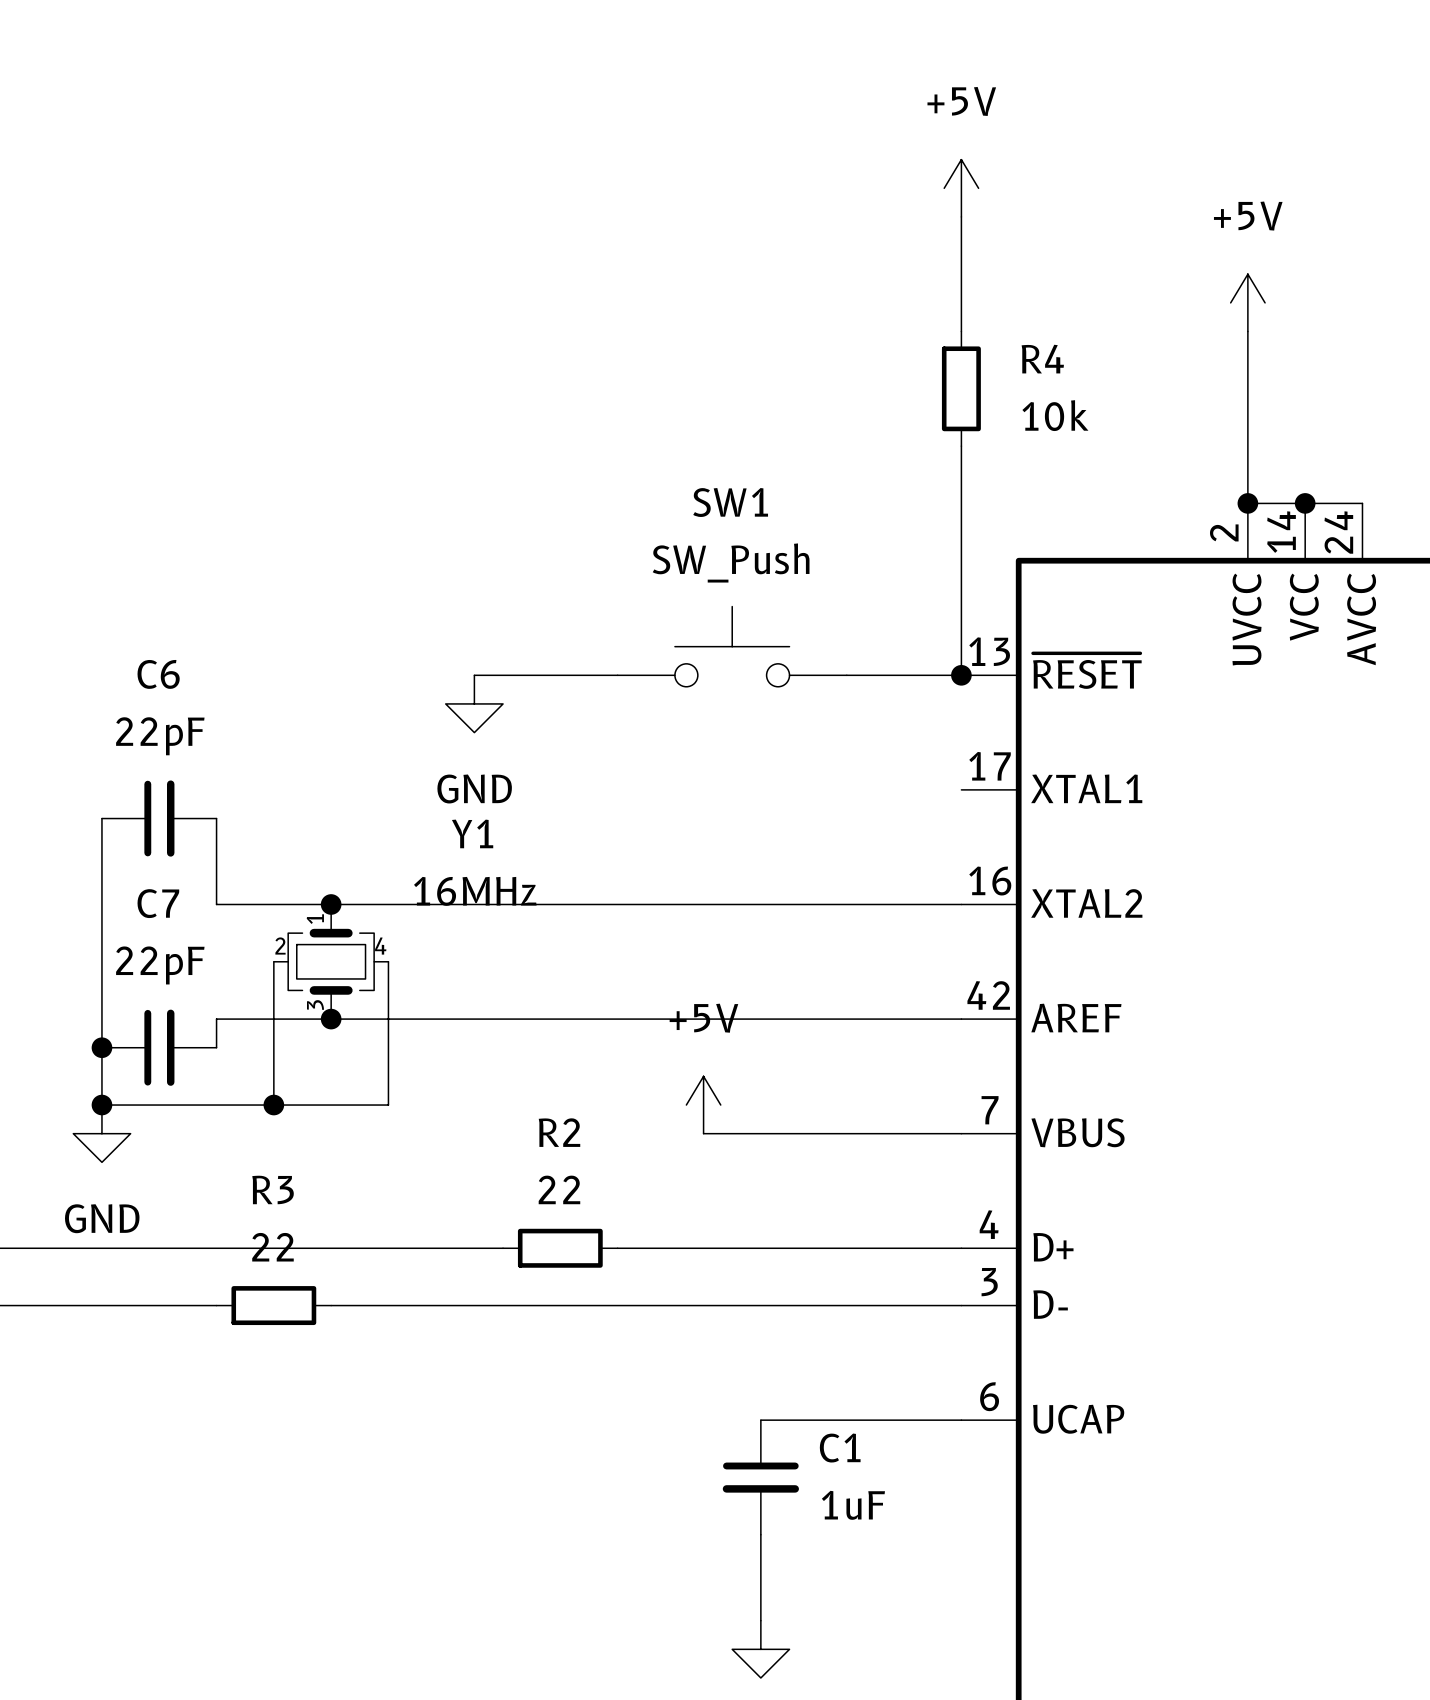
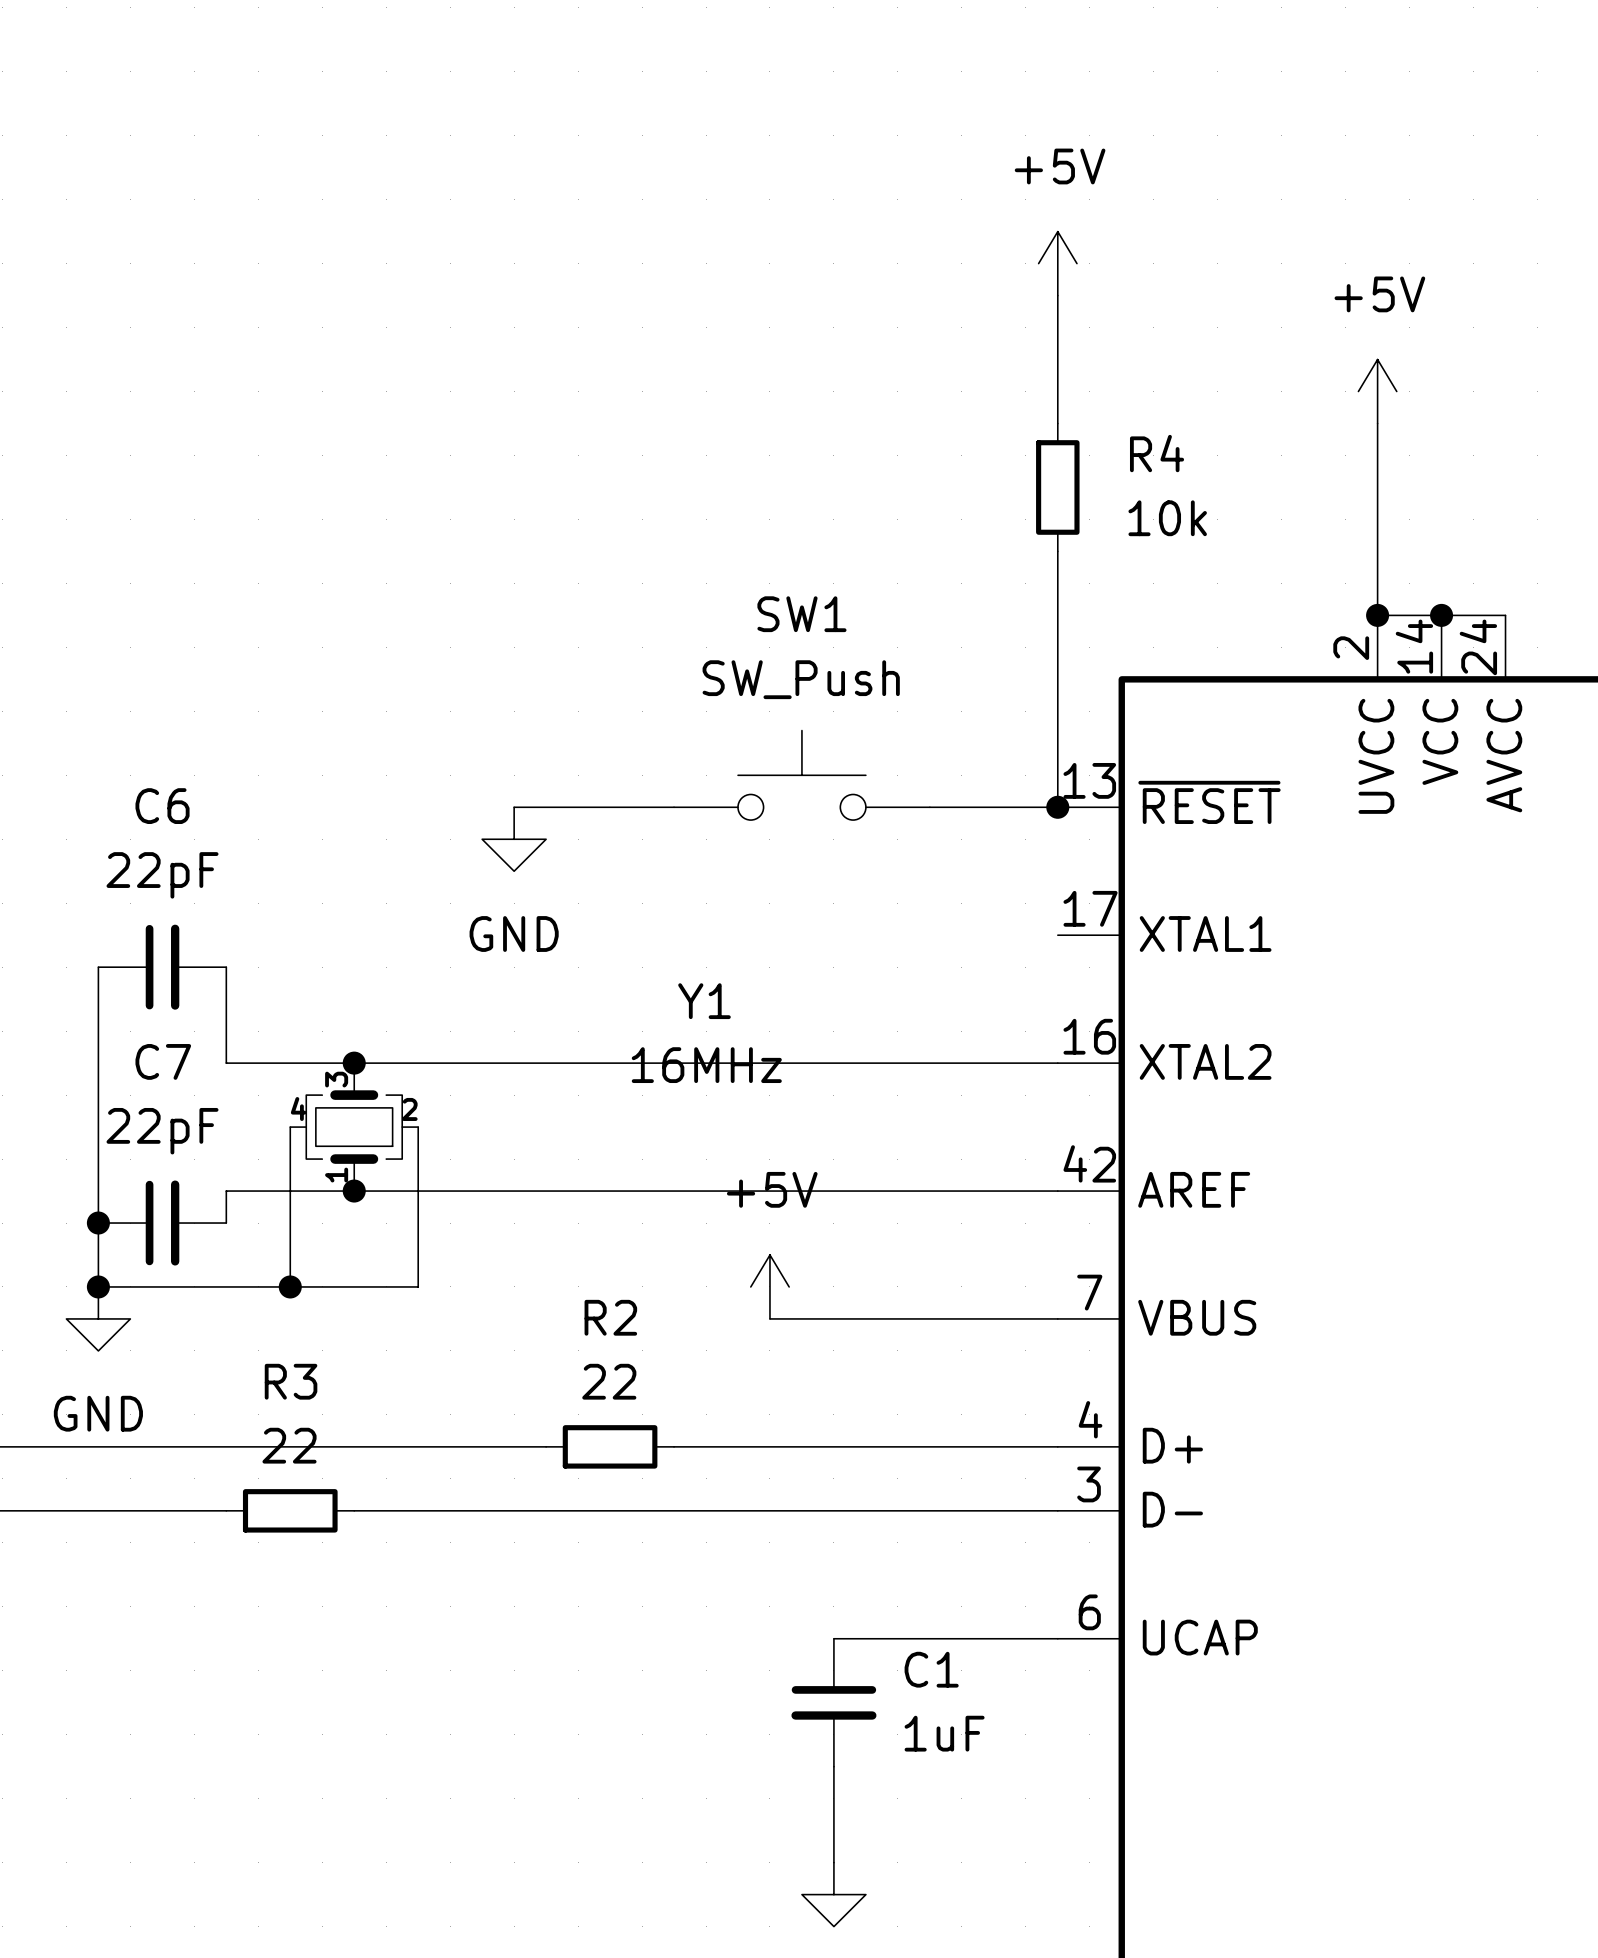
Y1 name position: Y1 (472, 833) -> Y1 (704, 1001)
Y1 value position: 16MHz (475, 891) -> 16MHz (706, 1065)
Y1 rotation: 0° (331, 961) -> 180° (354, 1127)

